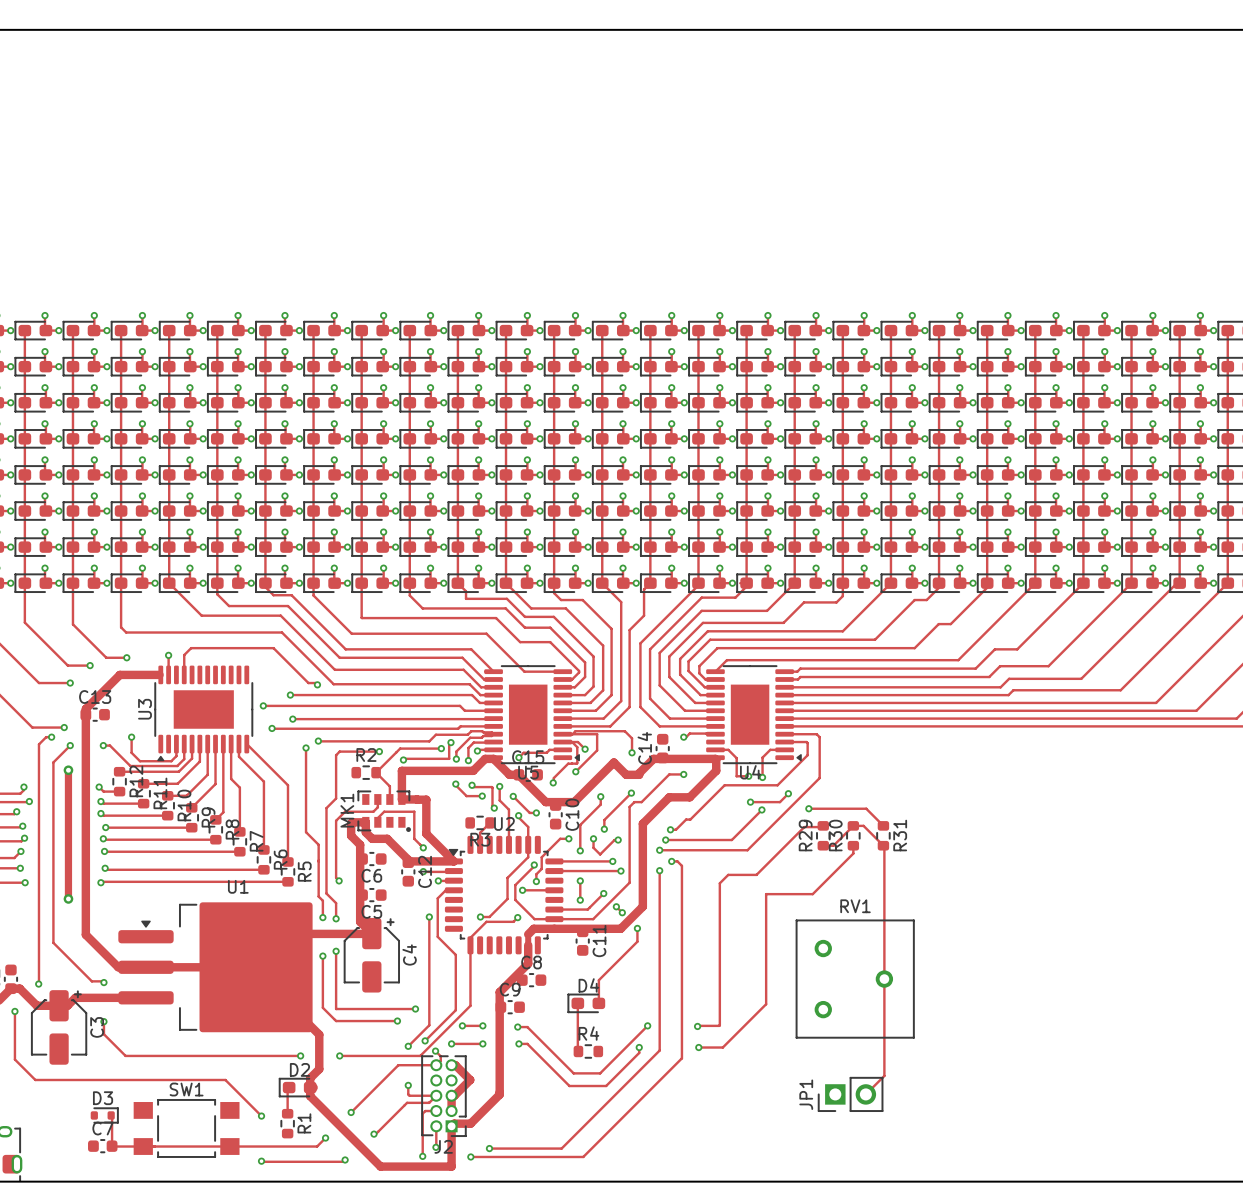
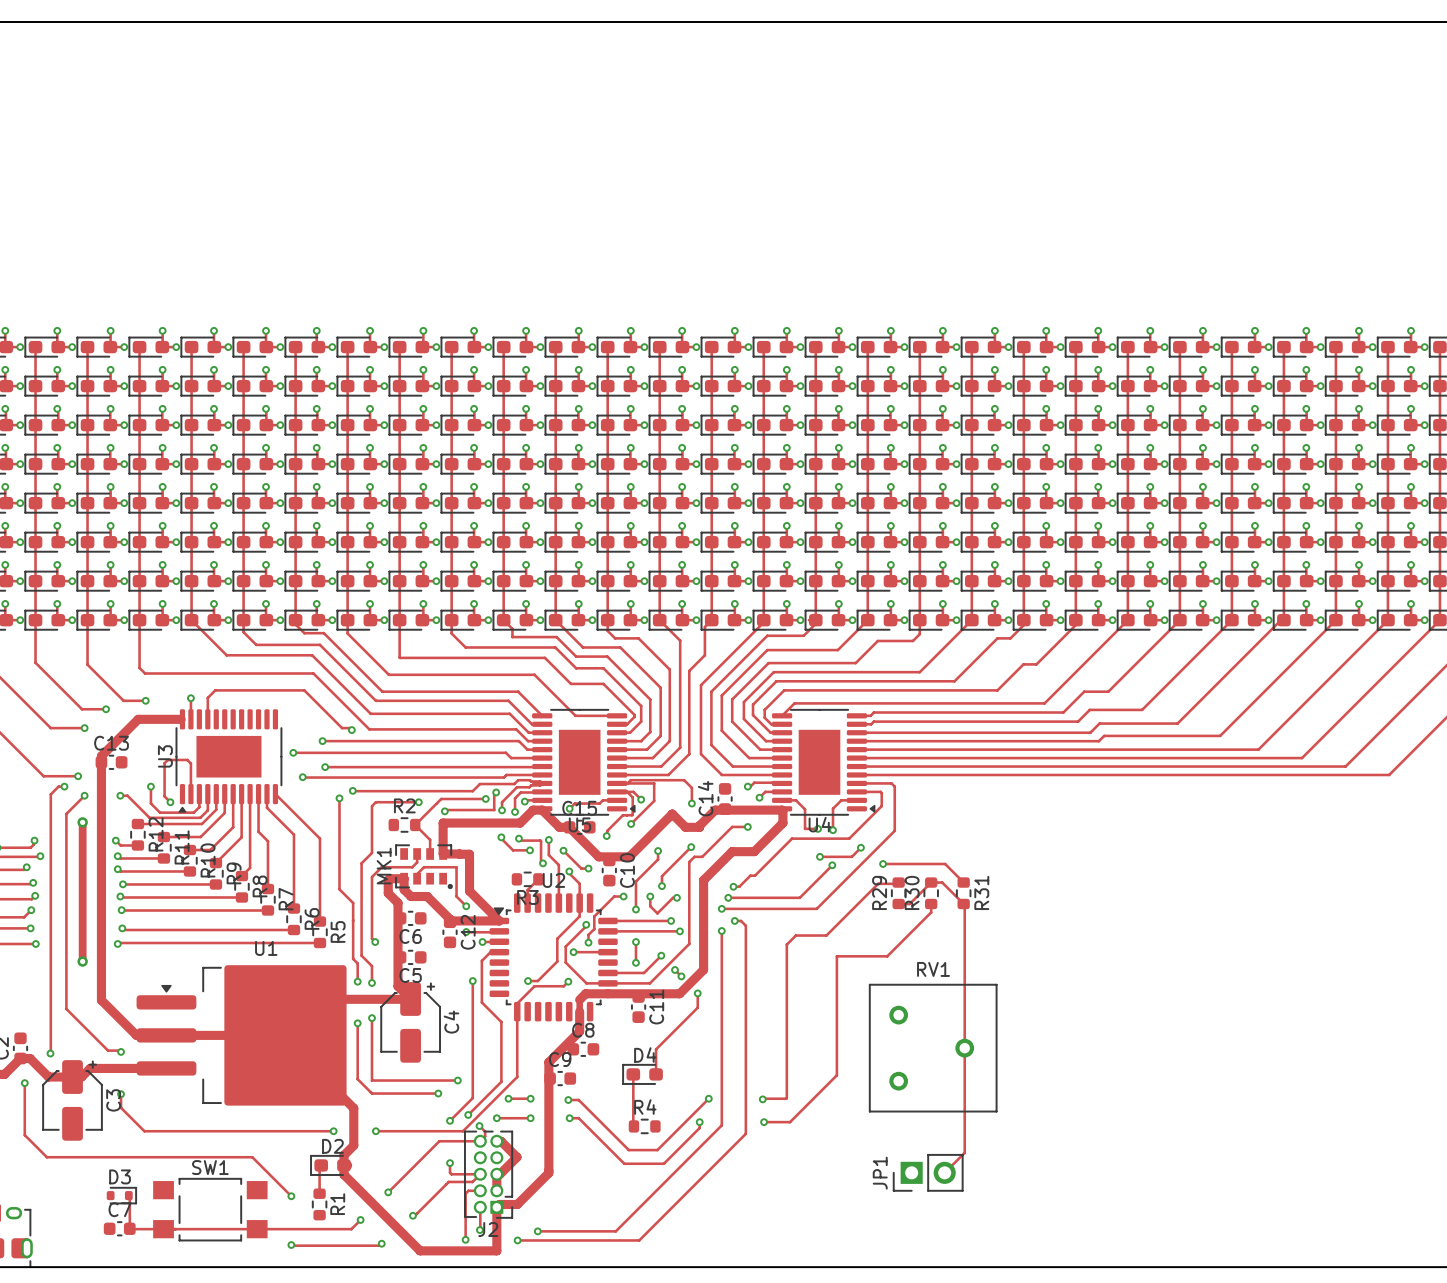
track: none -> (782, 791) (765, 791) (759, 797)
track: none -> (190, 794) (190, 763) (187, 759) (167, 759) (164, 763) (164, 796) (170, 802)
via: none -> (759, 797)
via: none -> (170, 802)

